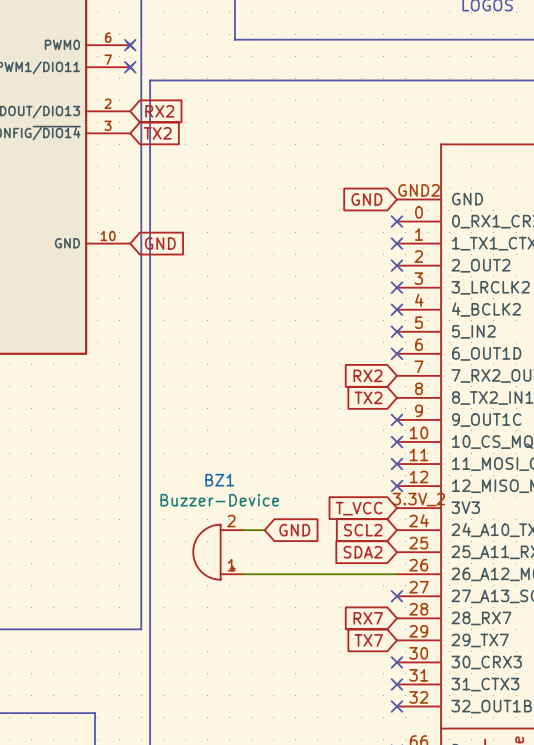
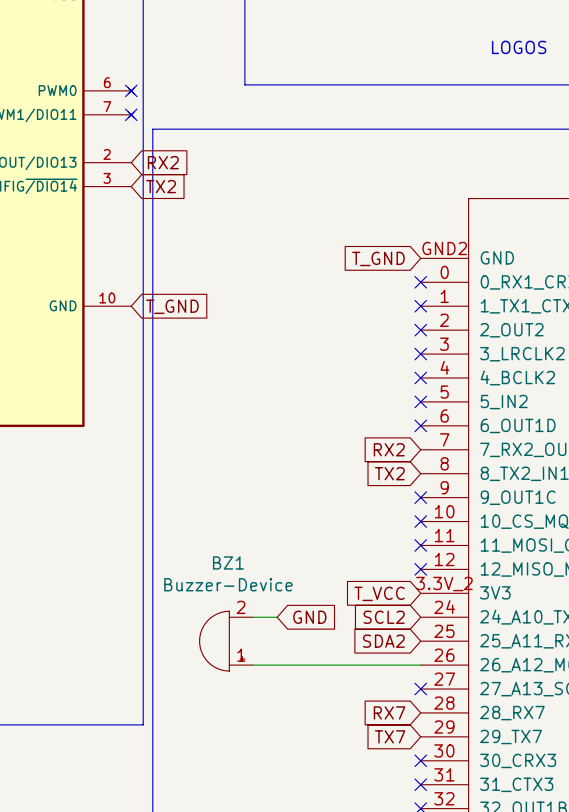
global label: GND (366, 199) -> T_GND (378, 258)
global label: GND (160, 243) -> T_GND (172, 306)

